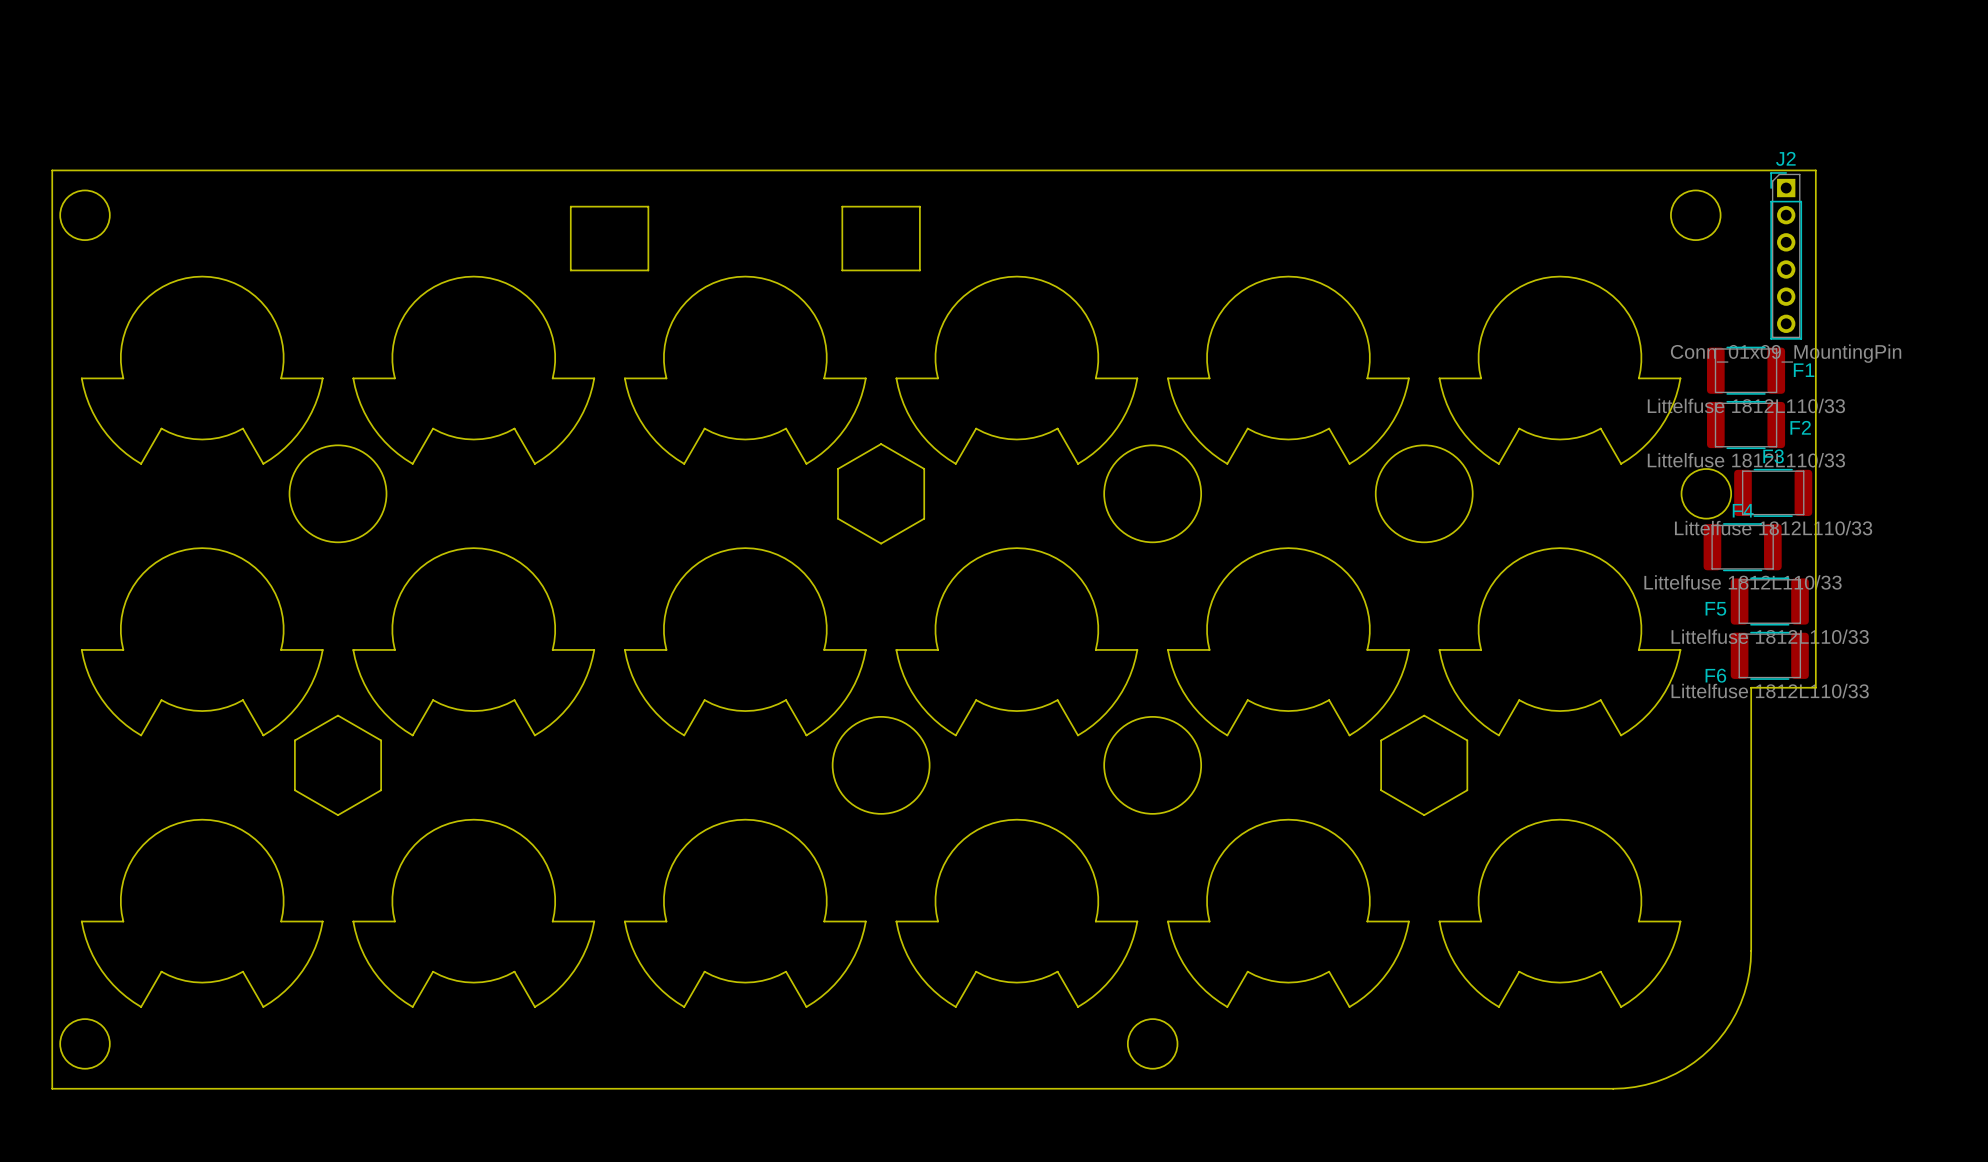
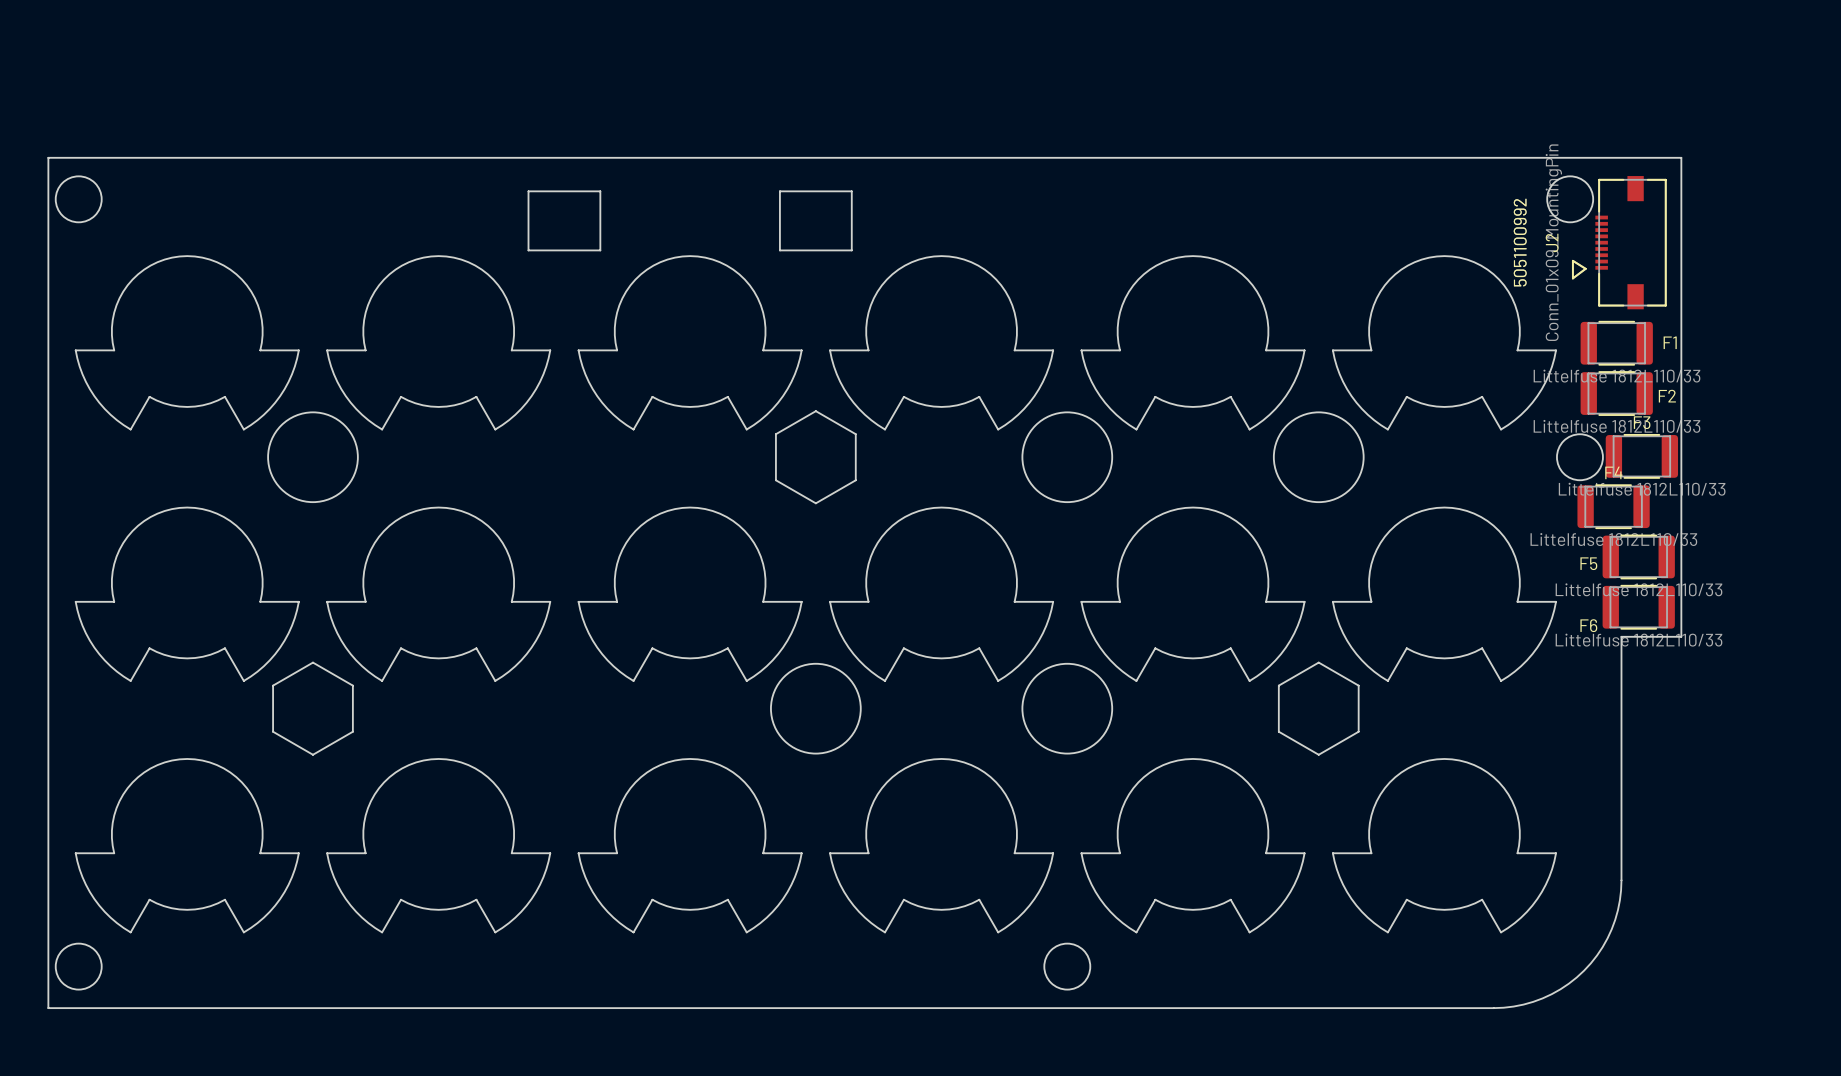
J2 name position: J2 (1785, 158) -> J2 (1552, 242)
J2 footprint: [1770, 172, 1803, 340] -> [1571, 176, 1667, 310]
J2 value position: Conn_01x09_MountingPin (1786, 353) -> Conn_01x09_MountingPin (1553, 242)

